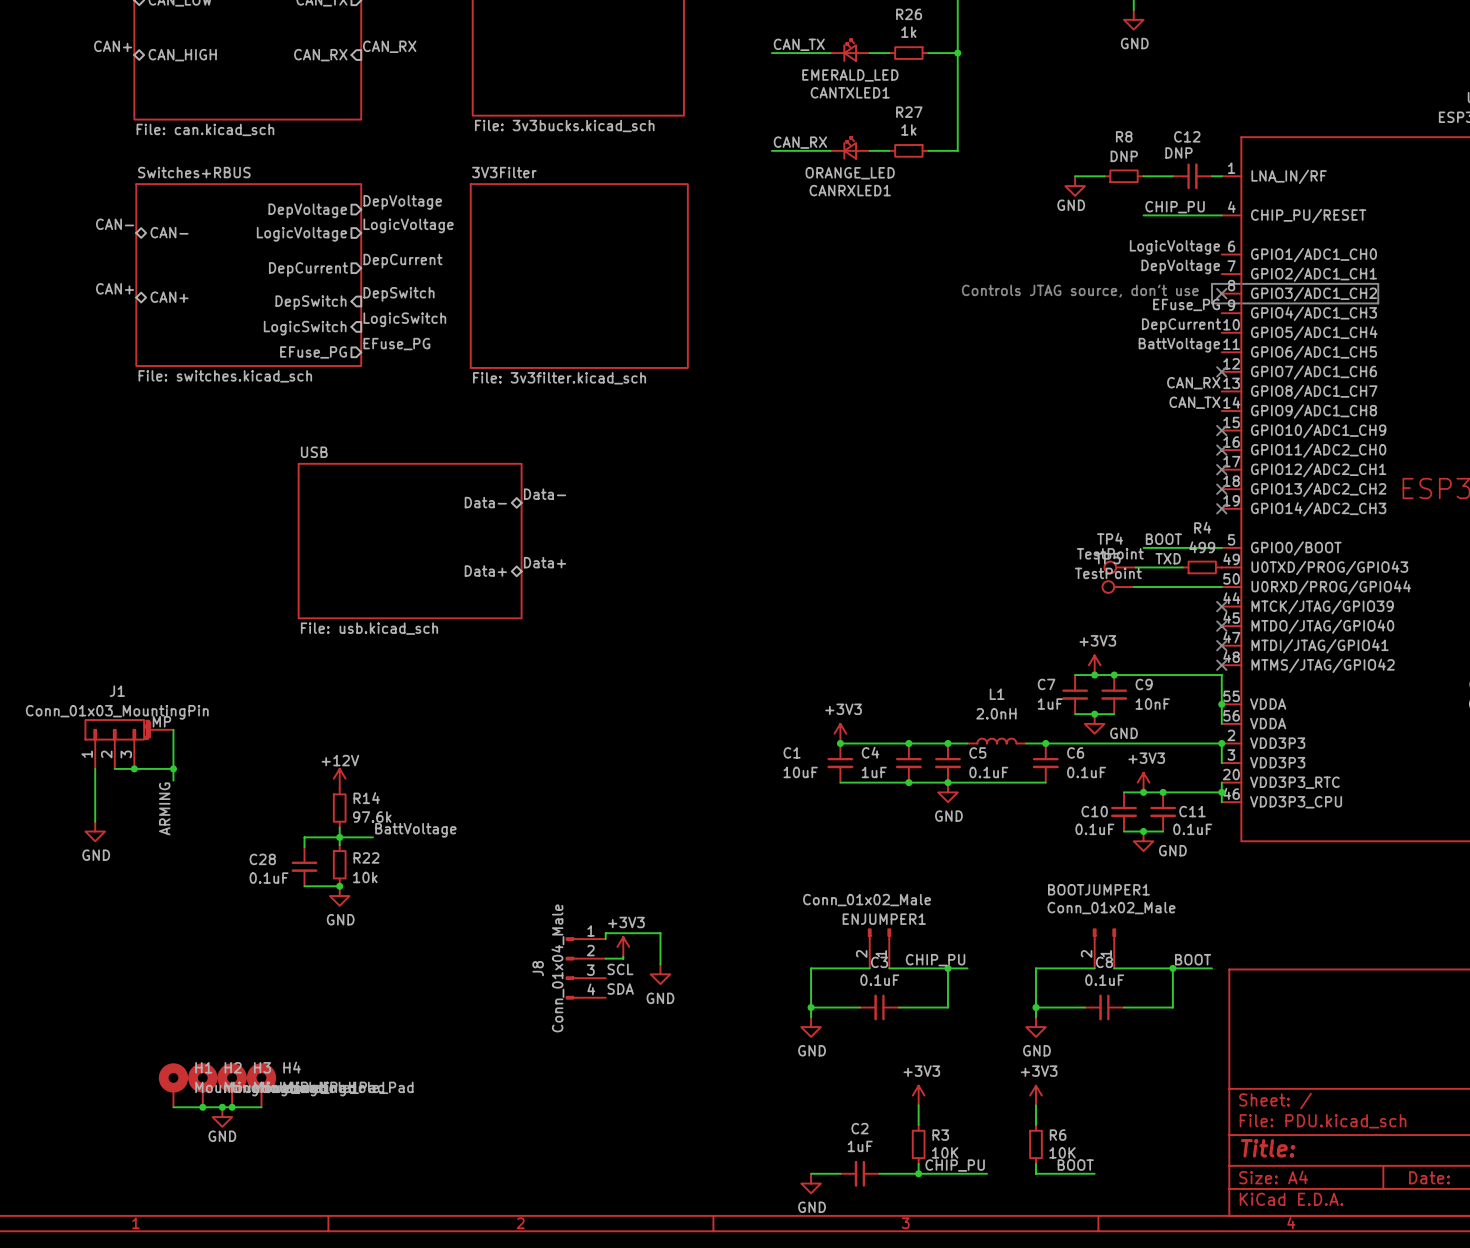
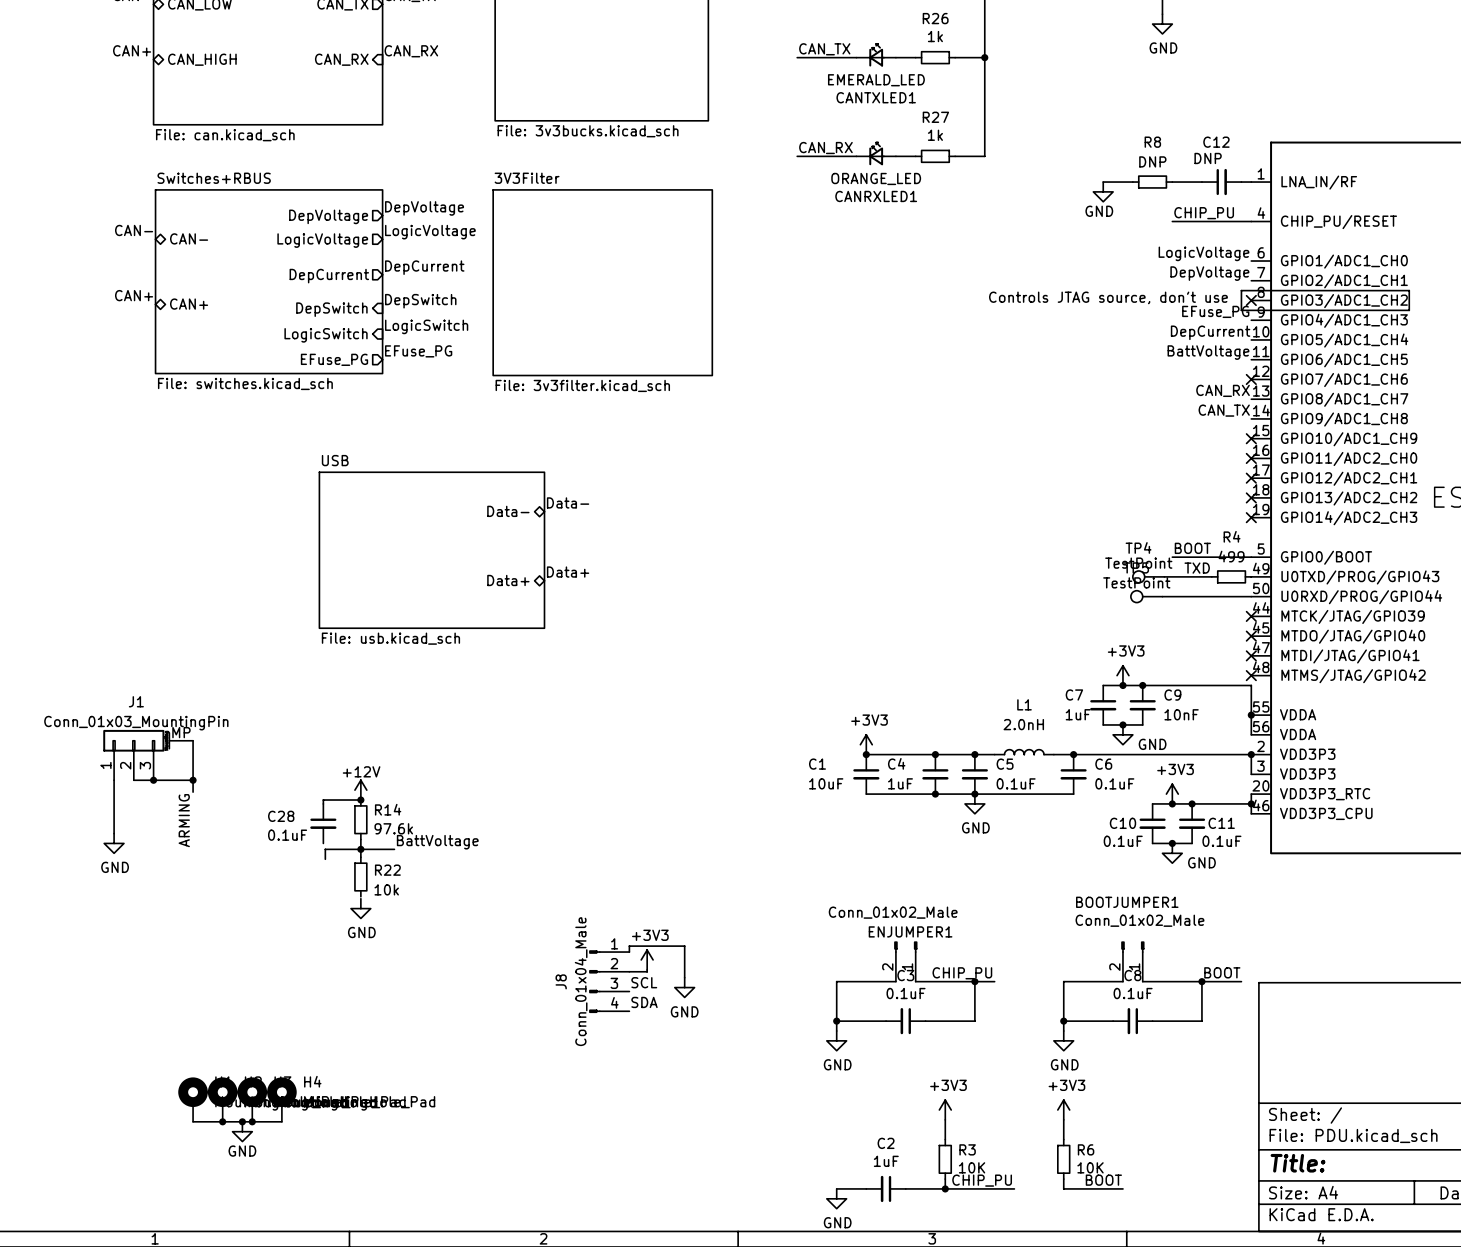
wire: none -> (360, 800) (323, 800) (323, 803)
junction: none -> (360, 800)
C28 position: (304, 866) -> (323, 823)
wire: (339, 884) (339, 886) (304, 886) -> none
junction: (339, 886) -> none

